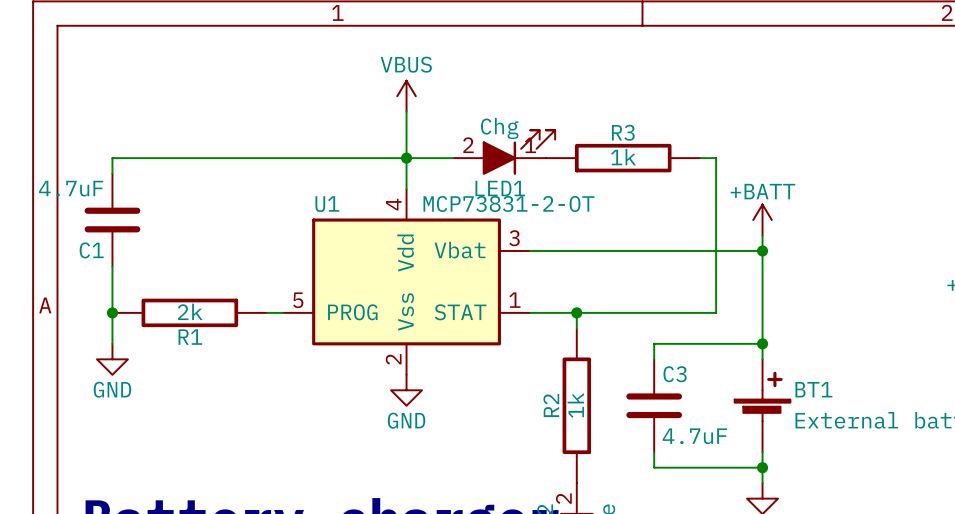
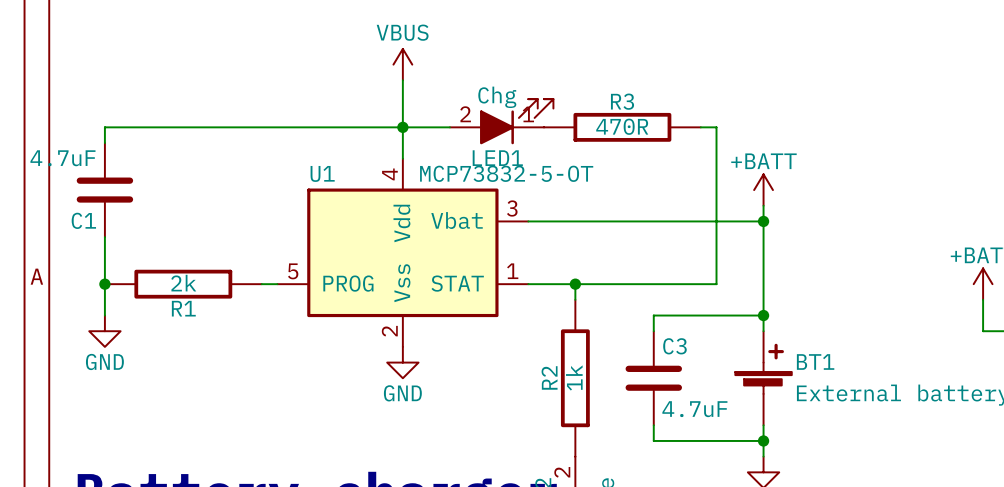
R3 value: 1k (623, 157) -> 470R (622, 126)
U1 value: MCP73831-2-OT (508, 203) -> MCP73832-5-OT (506, 173)

